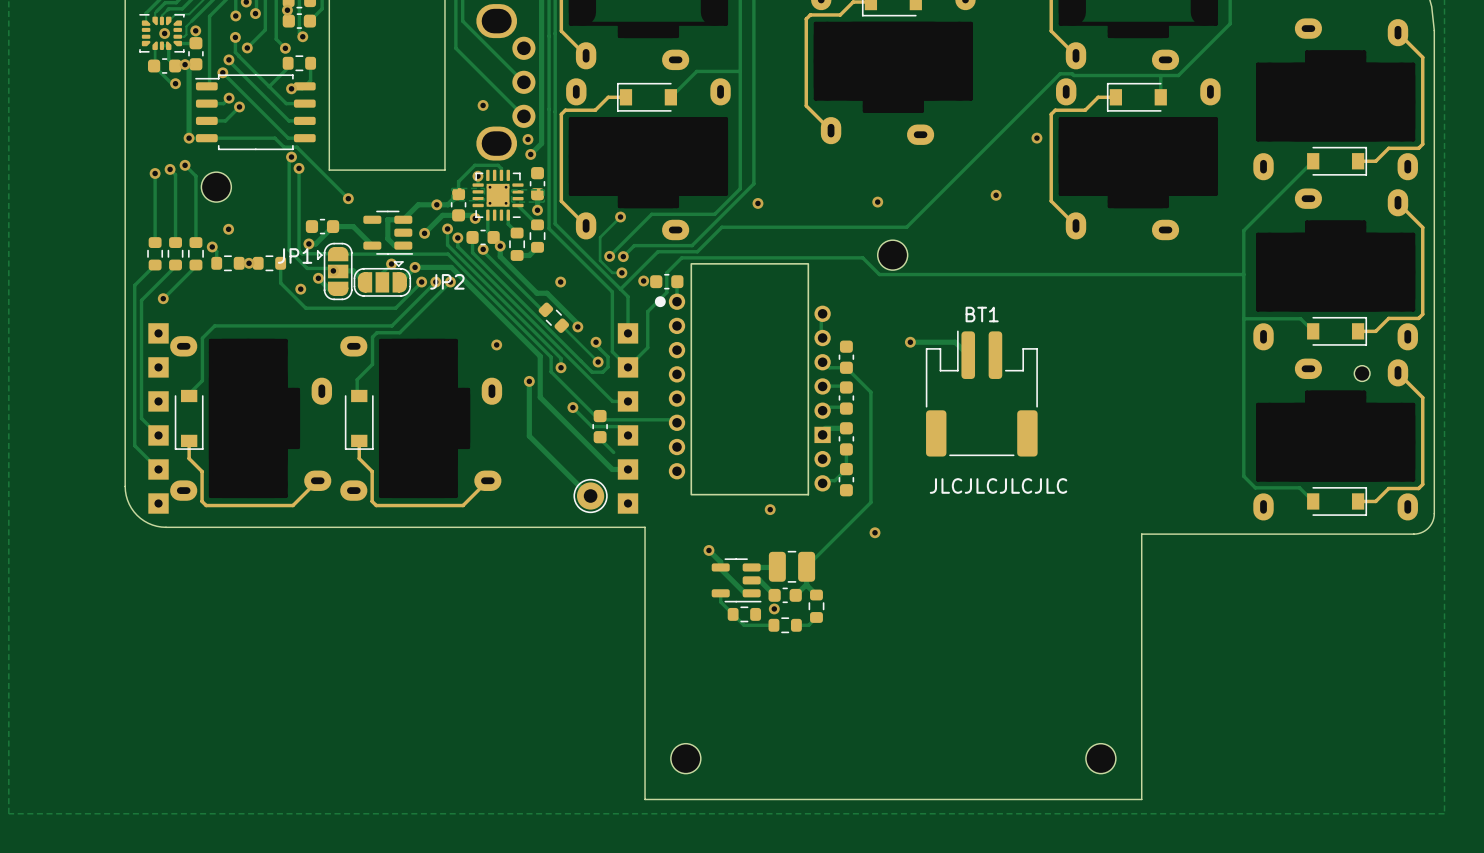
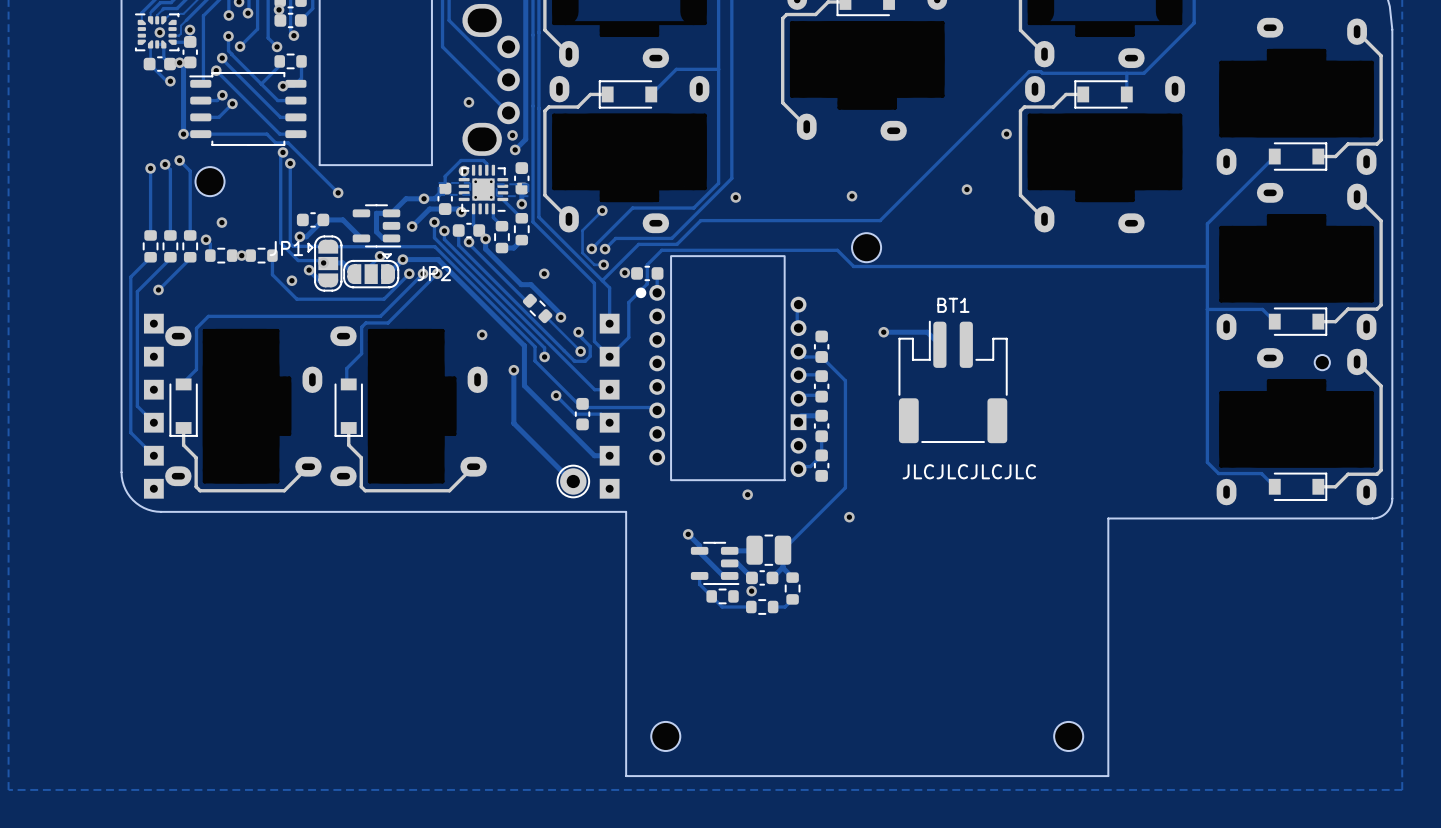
track: (600, 437) (613, 452) -> none

